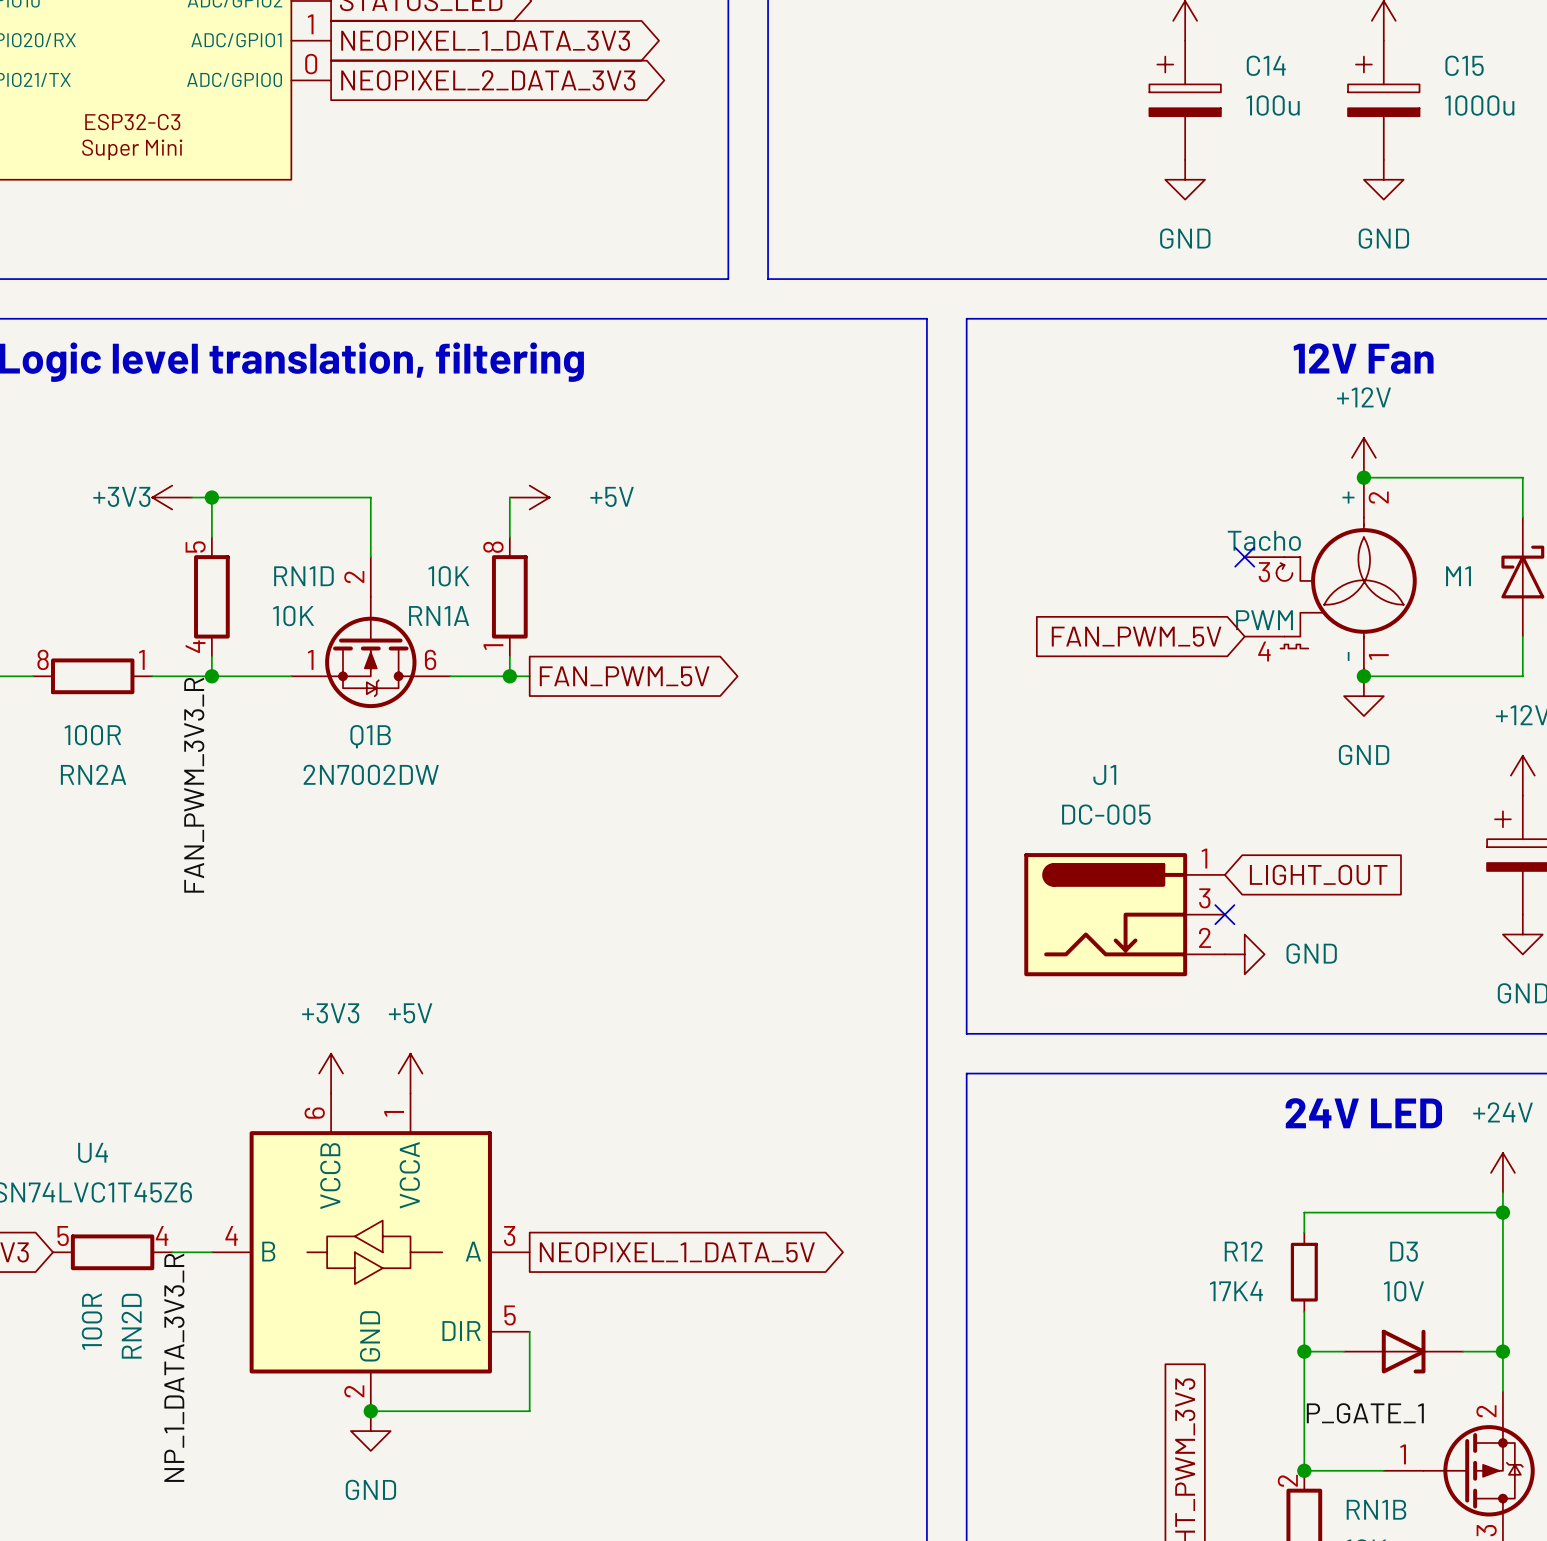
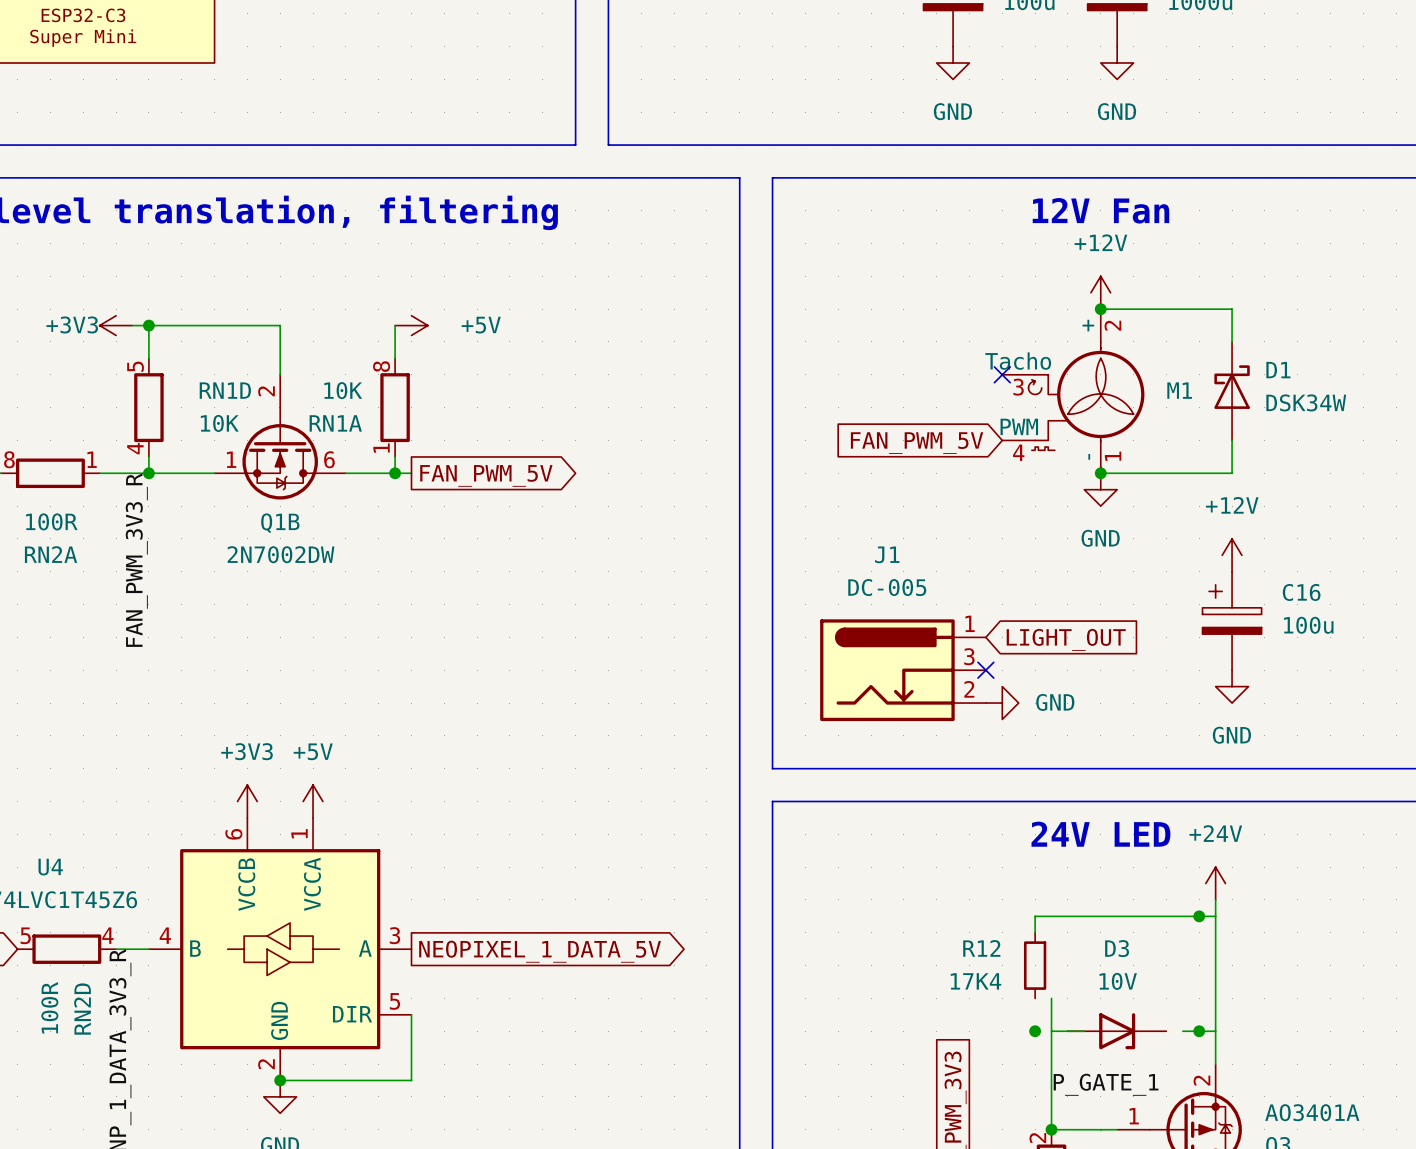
wire: (1304, 1212) (1304, 1232) -> (1051, 916) (1035, 916) (1035, 932)
junction position: (1502, 1212) -> (1199, 916)
R12 position: (1304, 1272) -> (1035, 965)
junction position: (1304, 1351) -> (1035, 1031)
D3 position: (1403, 1351) -> (1117, 1031)
junction position: (1502, 1351) -> (1199, 1031)

